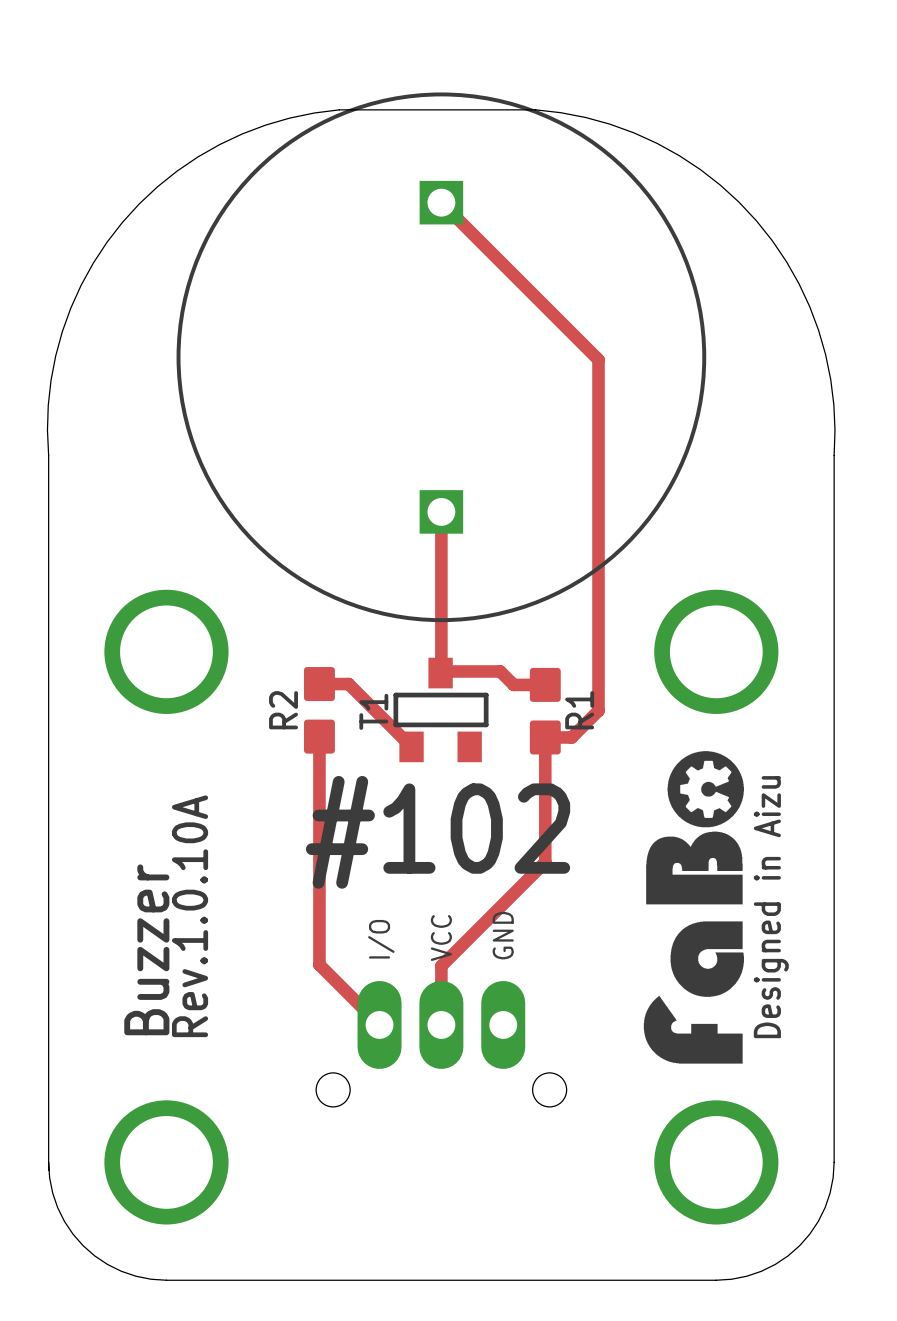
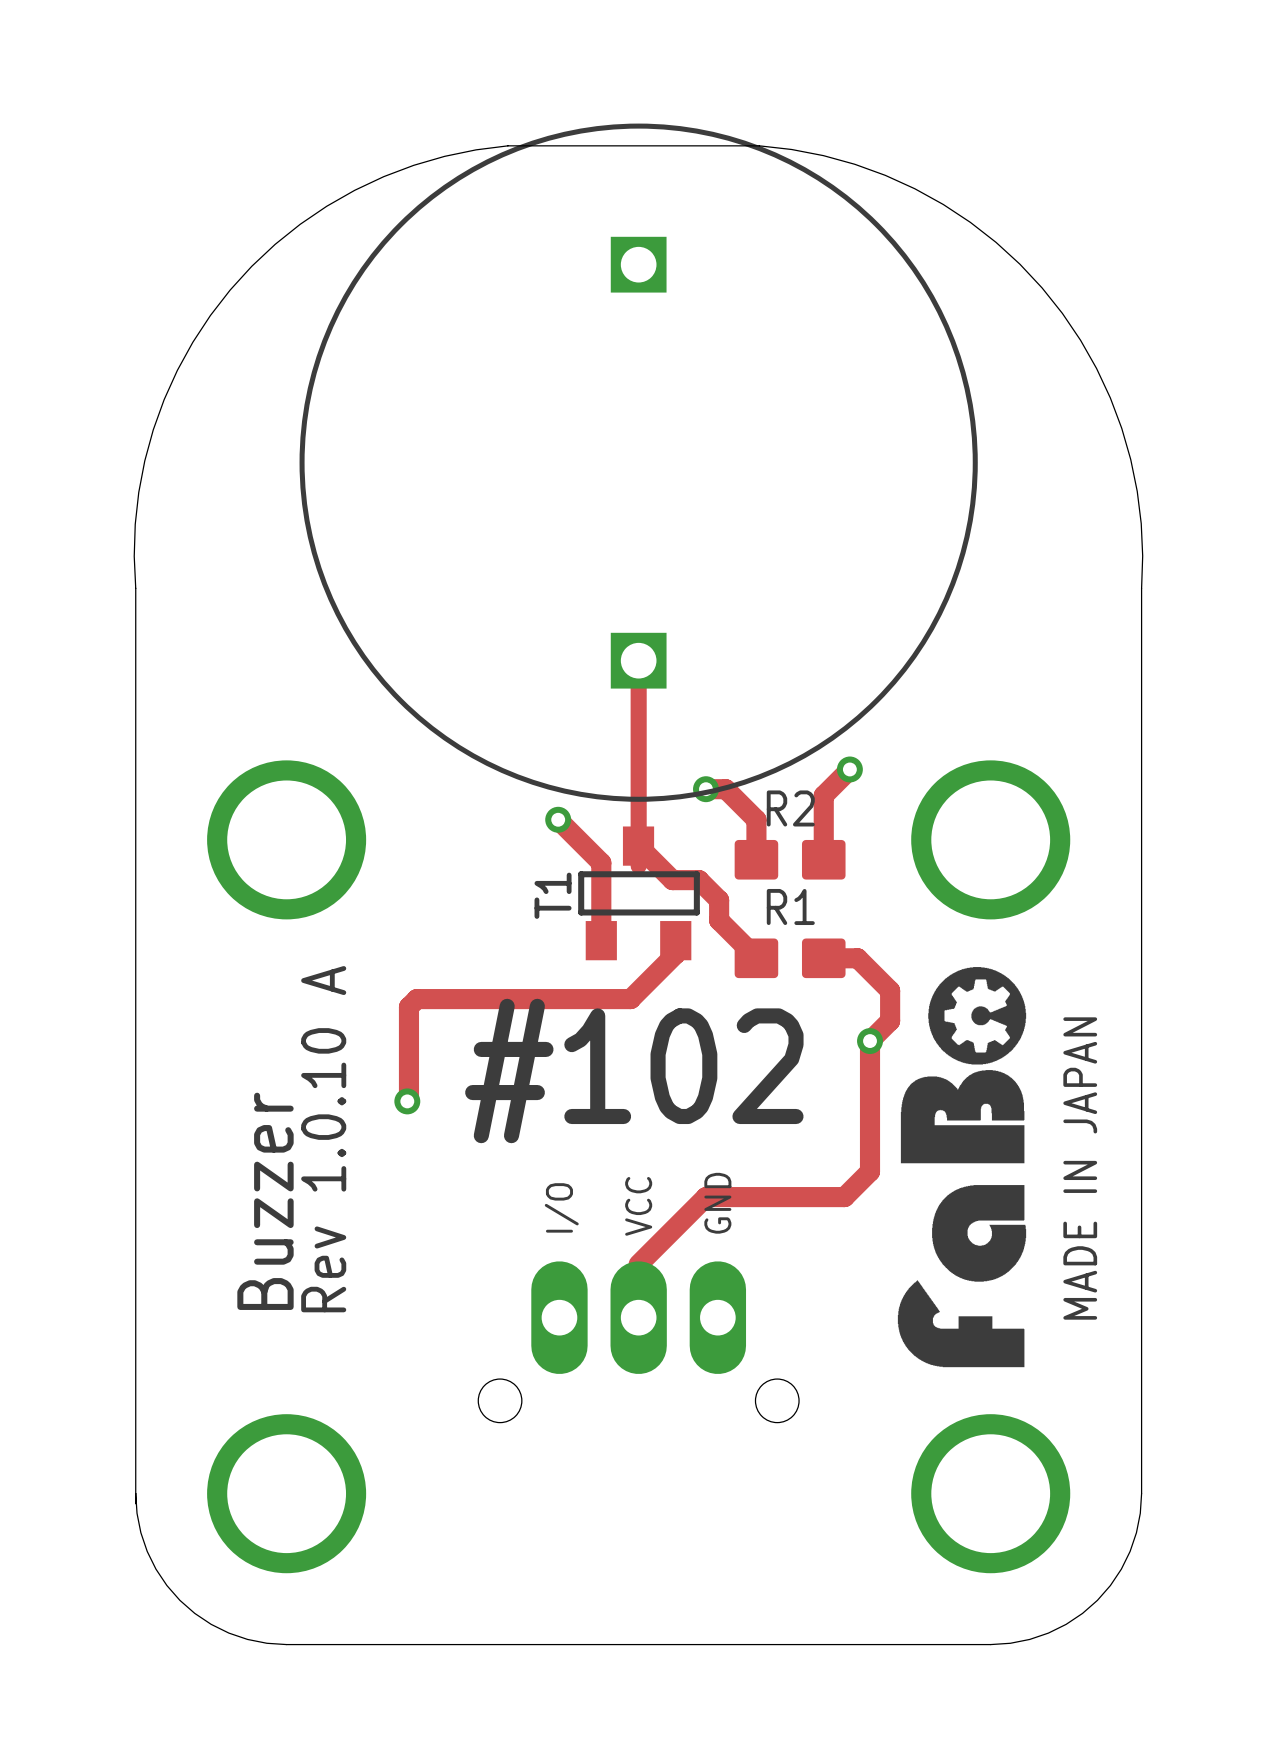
track: (441, 202) (598, 359) (598, 710) (571, 737) (545, 737) (545, 862) (441, 966) (441, 983) -> (823, 958) (857, 958) (890, 990) (890, 1020) (870, 1041) (870, 1171) (844, 1197) (705, 1197) (638, 1264)
track: none -> (849, 769) (823, 795) (823, 859)
via: none -> (849, 769)
track: none -> (705, 789) (725, 789) (756, 819) (756, 859)
via: none -> (705, 789)
track: none -> (558, 819) (601, 862) (601, 940)
via: none -> (558, 819)
track: none -> (638, 846) (672, 880) (699, 880) (719, 900) (719, 920) (756, 957)
track: (440, 673) (442, 671) (500, 671) (513, 684) (545, 684) -> none
track: (319, 684) (348, 684) (411, 746) -> none
T1 position: (441, 709) -> (639, 893)
R2 rotation: 0° (319, 710) -> 90° clockwise (790, 859)
R2 position: (319, 710) -> (790, 859)
R1 rotation: 0° (545, 711) -> 90° clockwise (790, 958)
track: none -> (675, 940) (675, 954) (630, 999) (416, 999) (408, 1007) (408, 1099) (407, 1101)
track: (319, 736) (319, 964) (379, 1024) -> none
via: none -> (870, 1041)
via: none -> (407, 1101)
text: Designed in Aizu (771, 907) -> none
text: none -> MADE IN JAPAN (1080, 1168)
text: Rev.1.0.10A (190, 916) -> Rev 1.0.10 A (323, 1139)
text position: Buzzer (146, 949) -> Buzzer (265, 1201)

